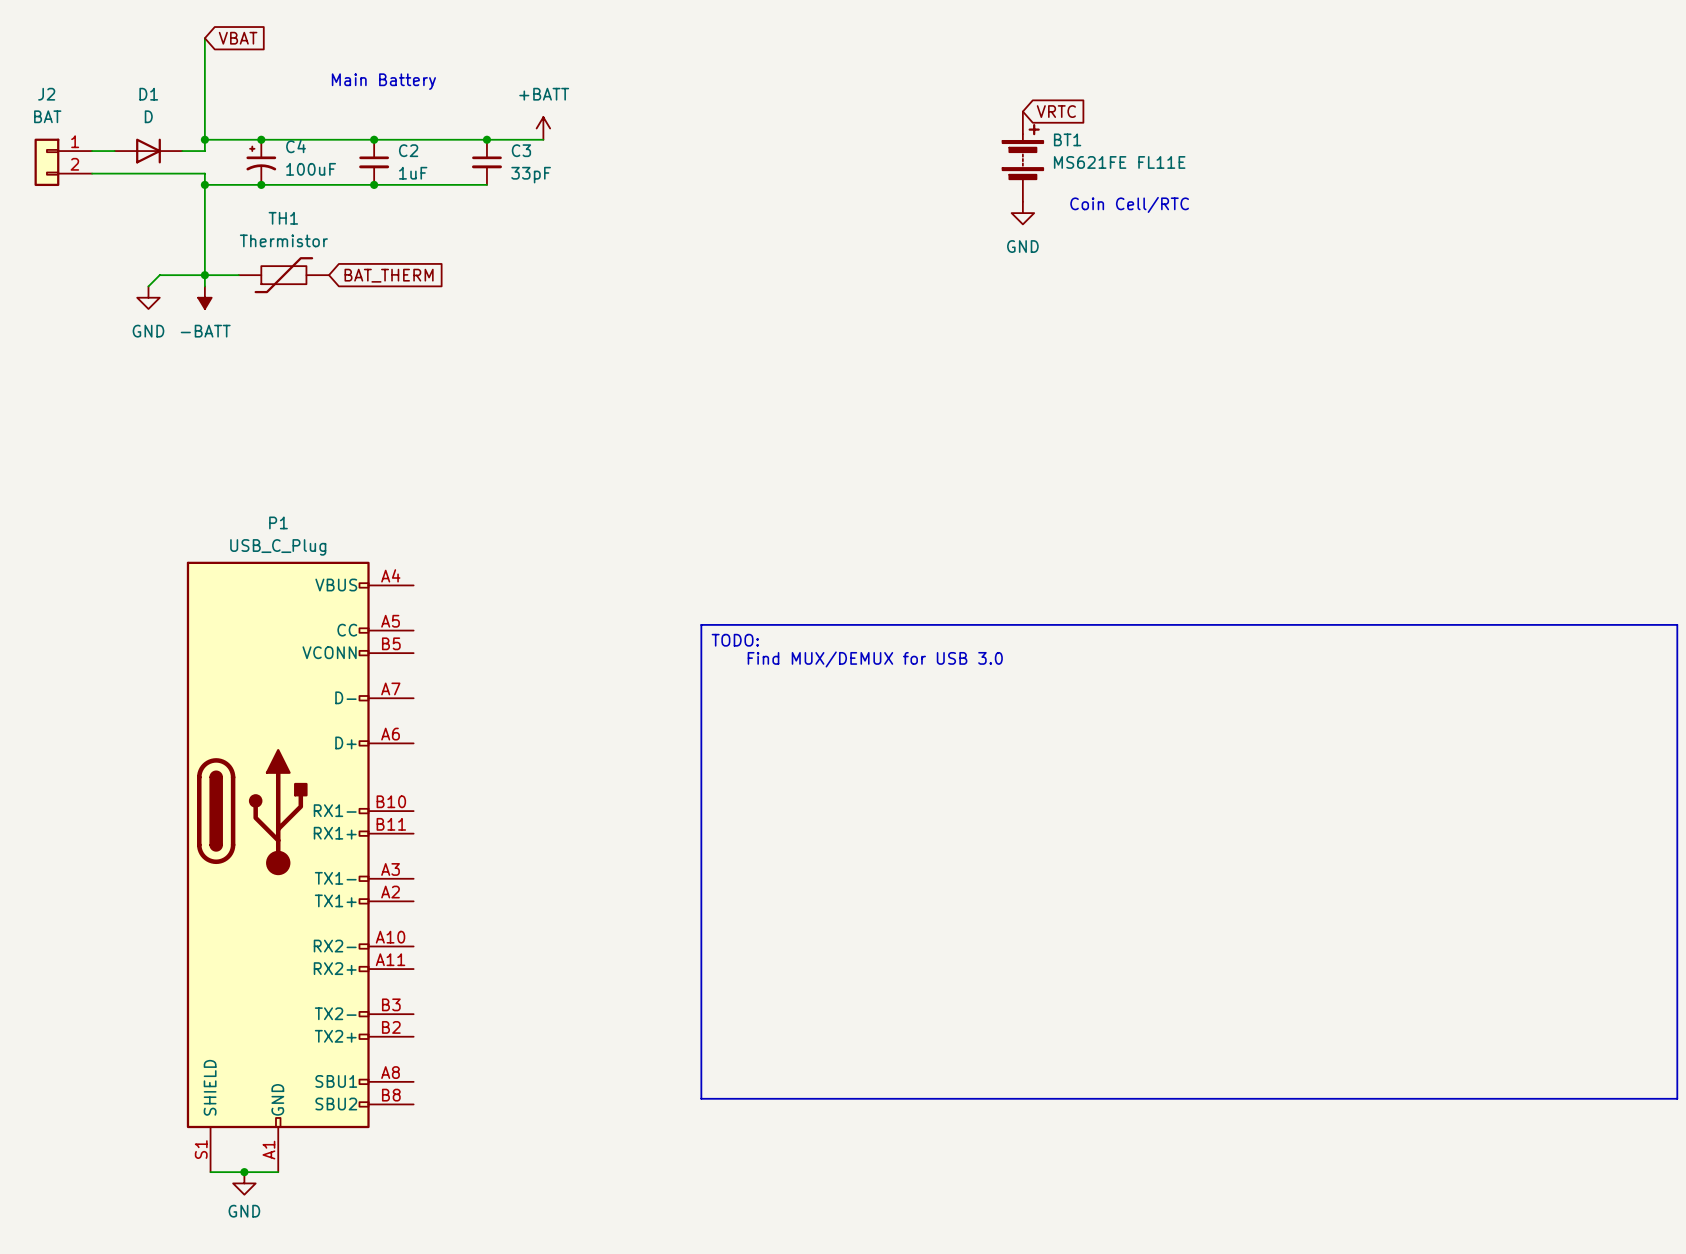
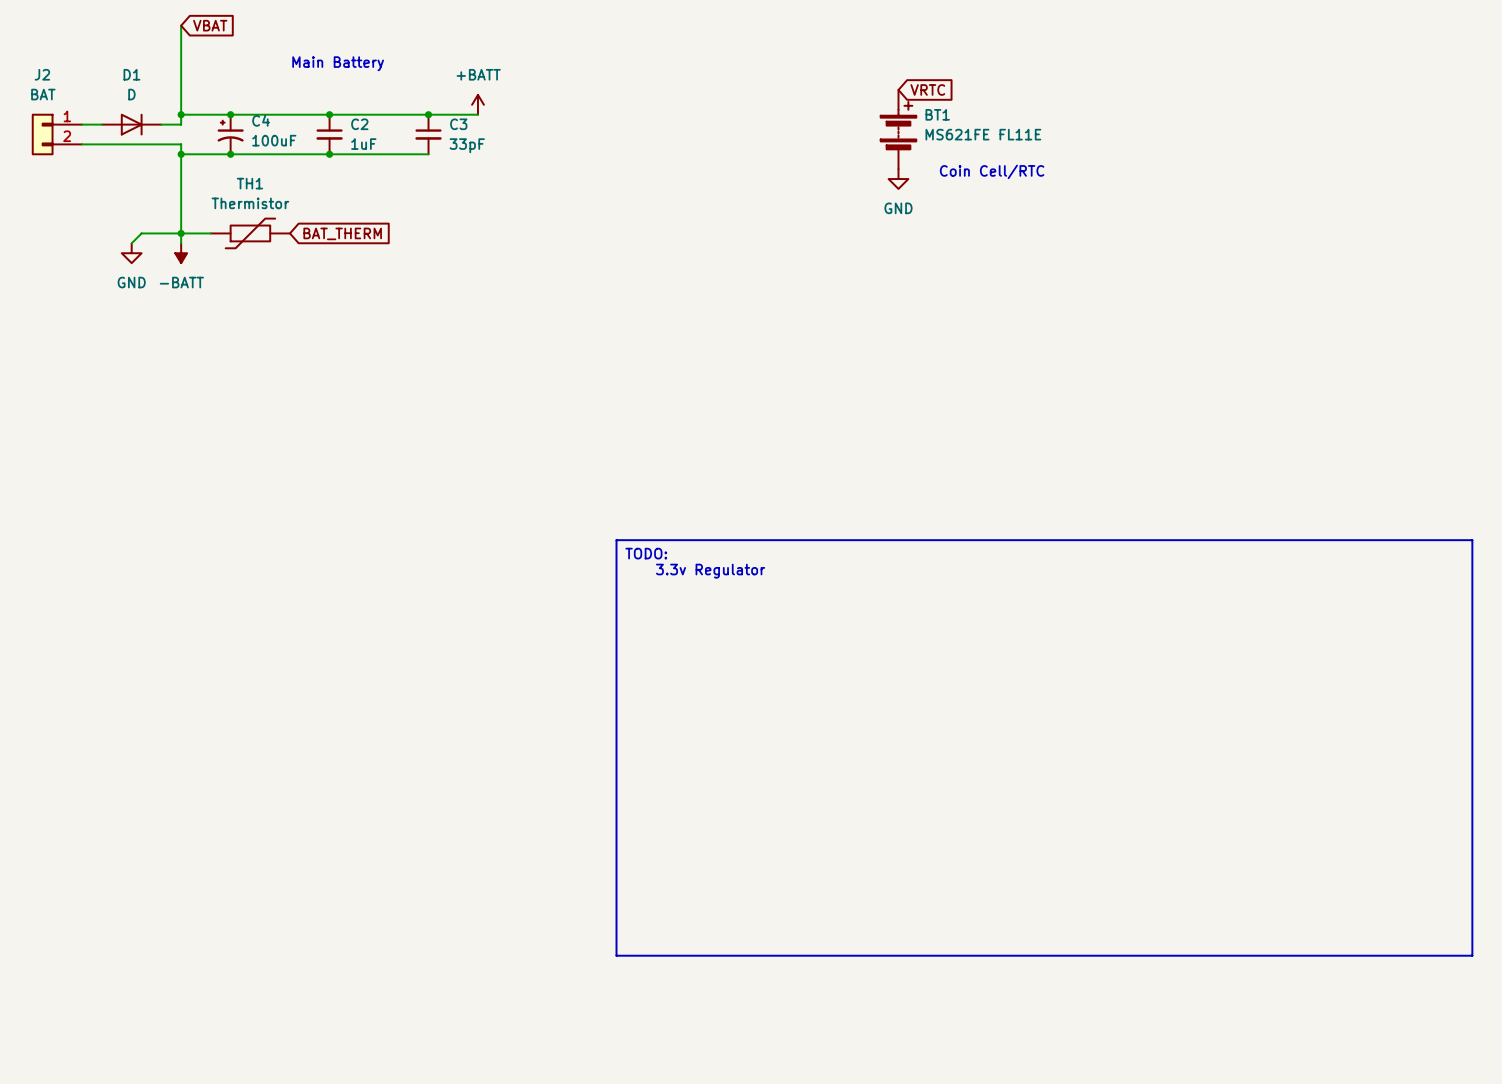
text: Find MUX/DEMUX for USB 3.0 (875, 659) -> 3.3v Regulator (710, 571)
P1: USB_C_Plug (300, 866) -> none
wire: (210, 1172) (278, 1172) -> none
junction: (244, 1172) -> none
power symbol: GND (244, 1183) -> none

